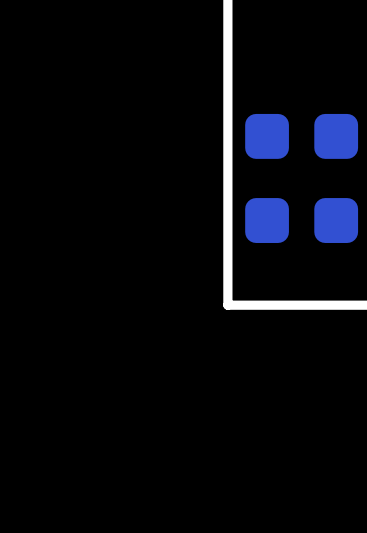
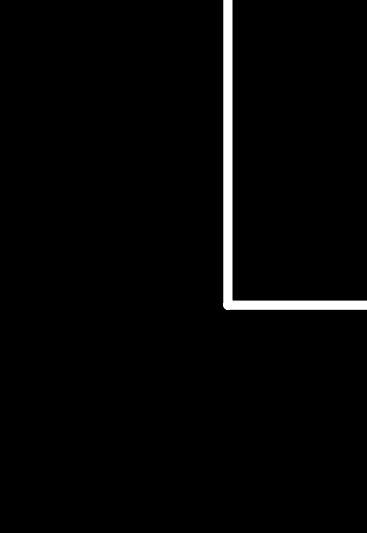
part: (267, 178) -> none
part: (336, 178) -> none

